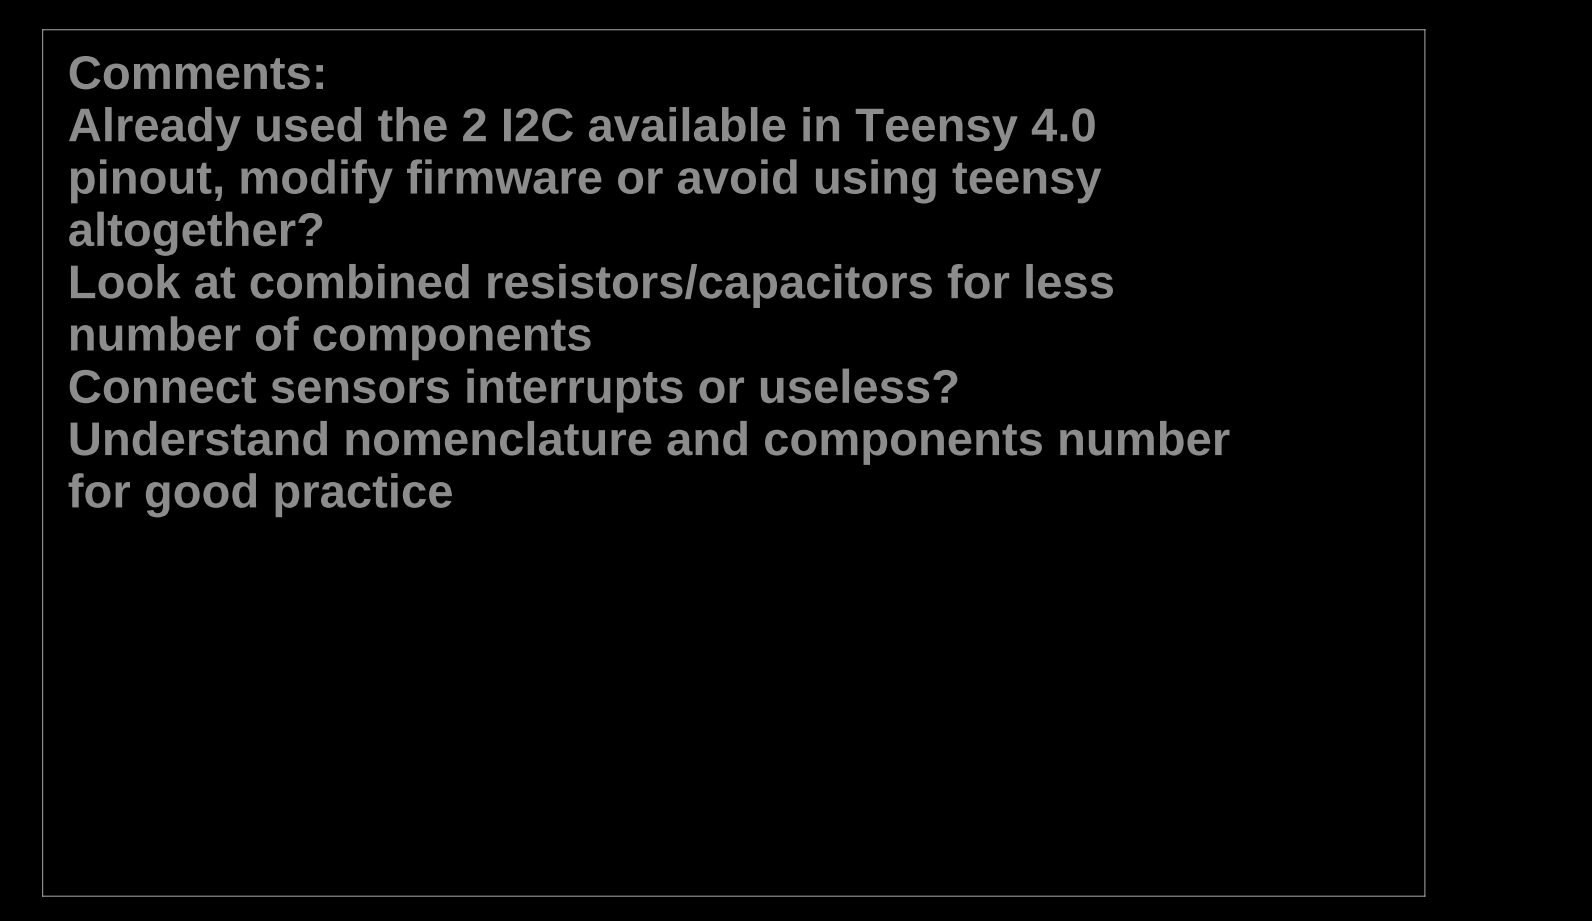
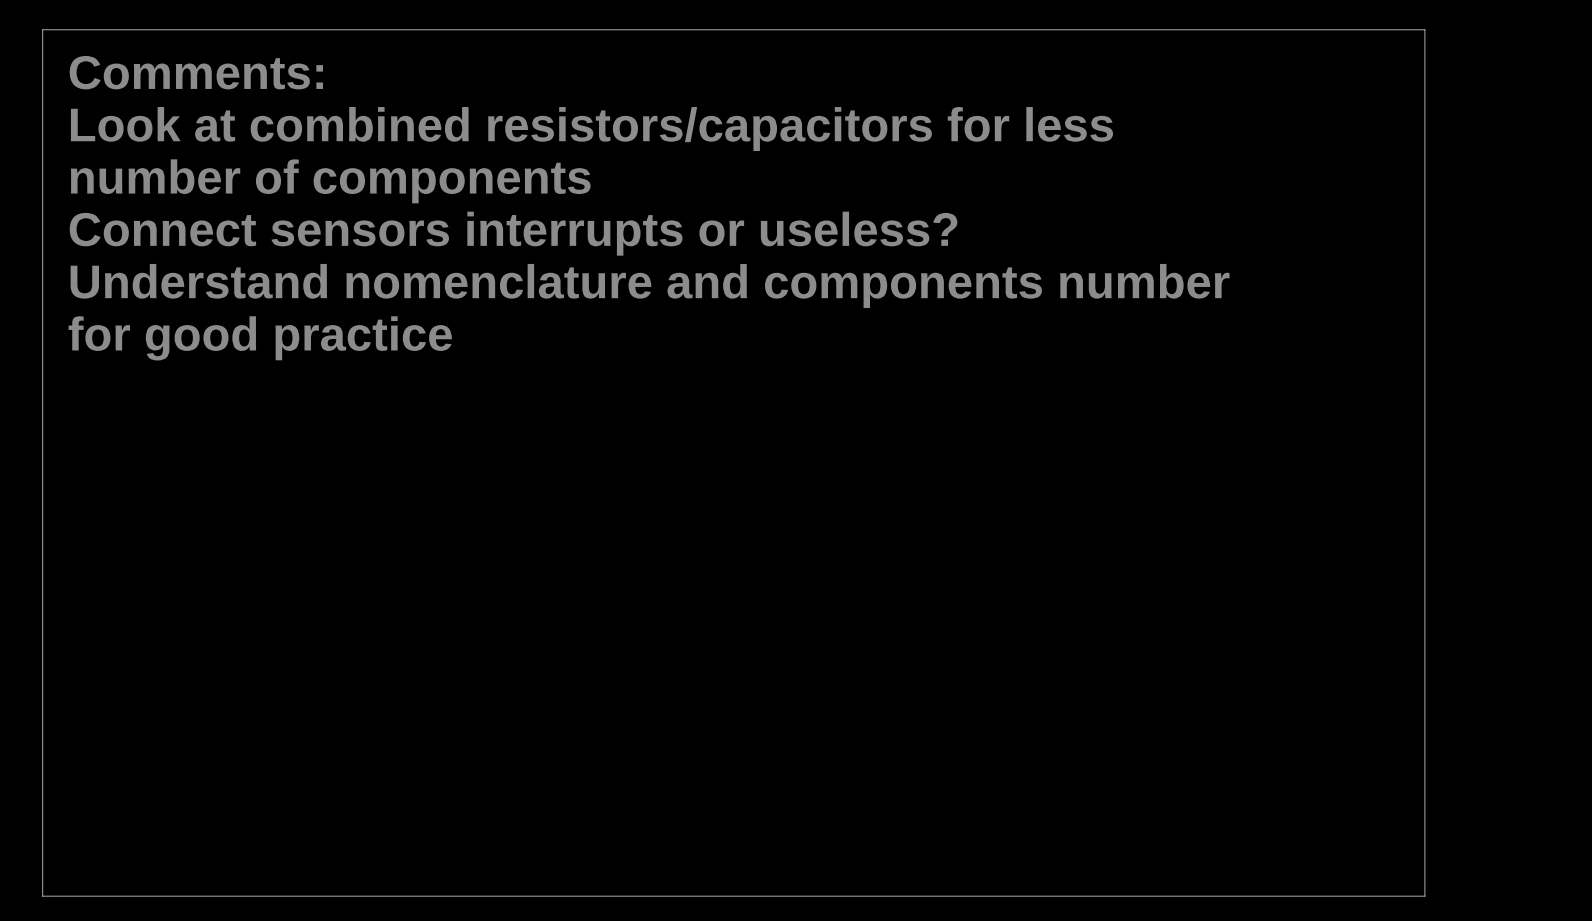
text: Already used the 2 I2C available in Teensy 4.0 (581, 129) -> Look at combined resistors/capacitors for less (591, 129)
text: pinout, modify firmware or avoid using teensy (586, 181) -> number of components (330, 181)
text: altogether? (195, 233) -> Connect sensors interrupts or useless? (513, 233)
text: Look at combined resistors/capacitors for less (591, 285) -> Understand nomenclature and components number (650, 285)
text: number of components (330, 338) -> for good practice (260, 338)
text: Connect sensors interrupts or useless? (513, 390) -> none
text: Understand nomenclature and components number (650, 442) -> none
text: for good practice (260, 495) -> none

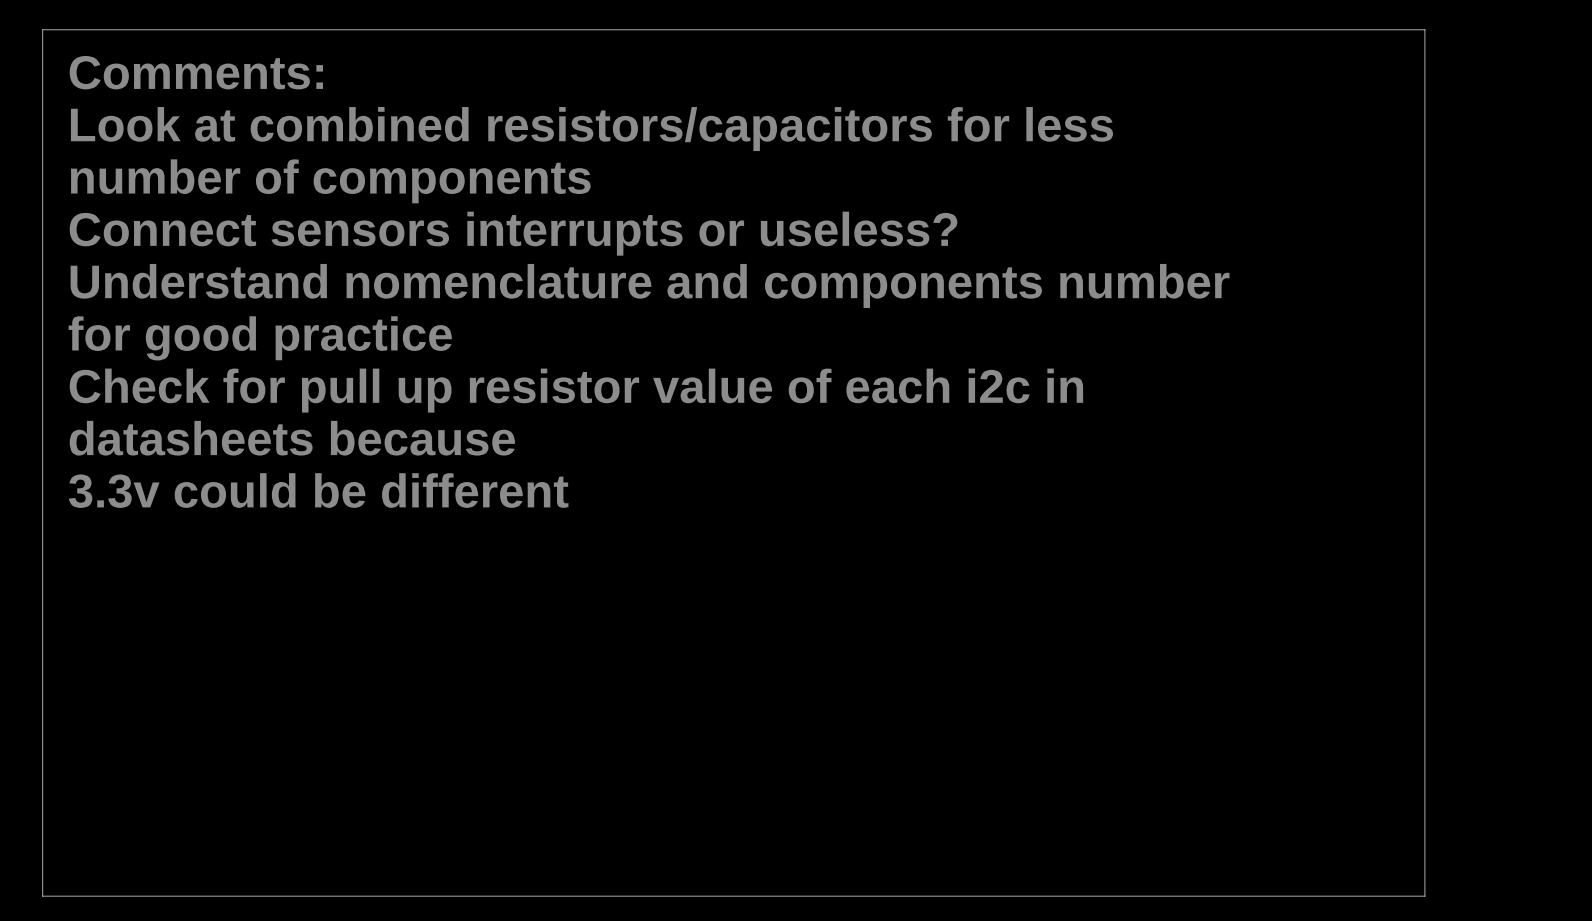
text: none -> Check for pull up resistor value of each i2c in (576, 390)
text: none -> datasheets because (292, 438)
text: none -> 3.3v could be different (318, 490)

